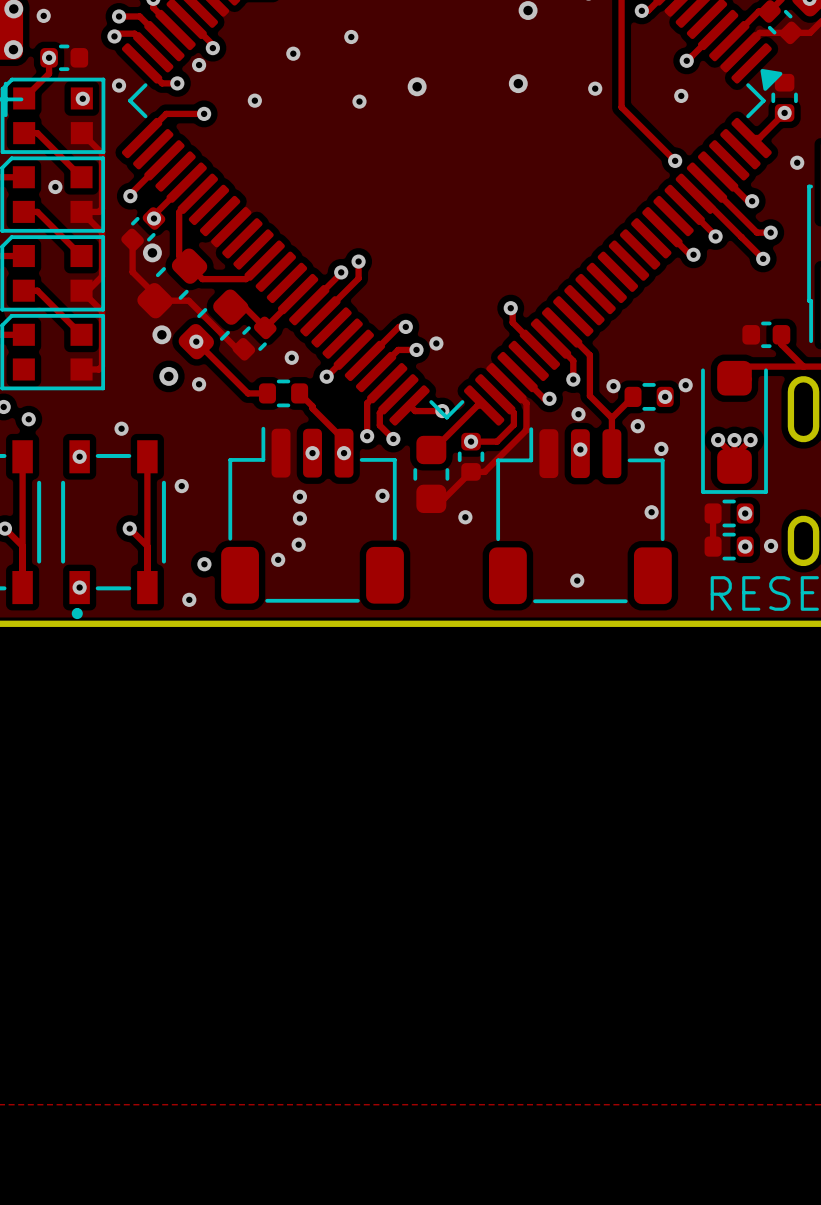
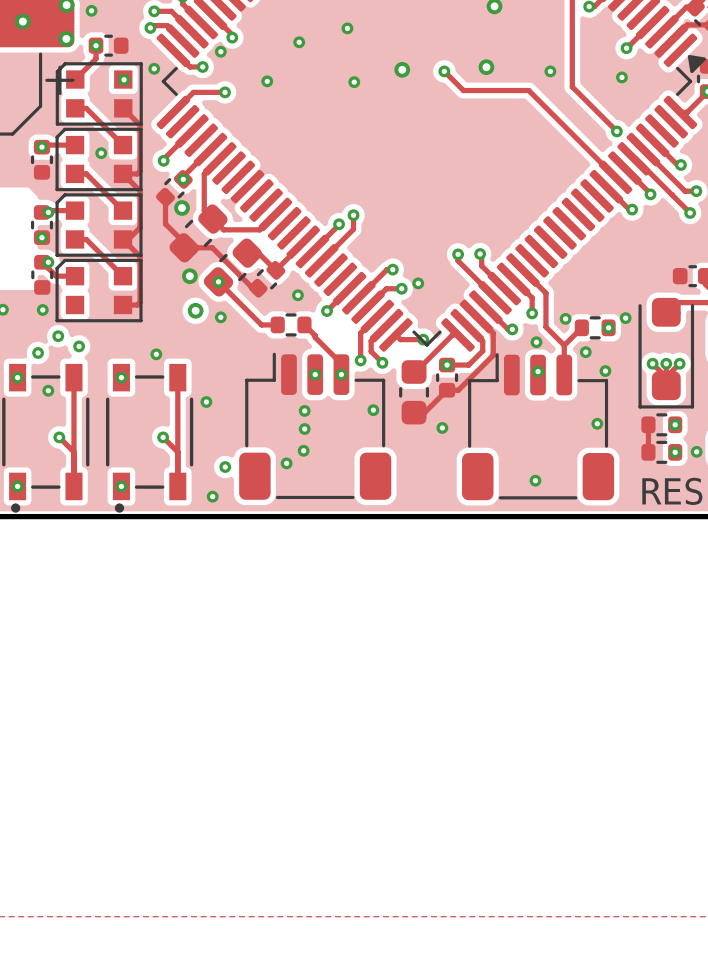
track: none -> (444, 71) (463, 90) (528, 90) (615, 177)
via: none -> (444, 71)
track: none -> (458, 254) (458, 260) (495, 297)
via: none -> (458, 254)

